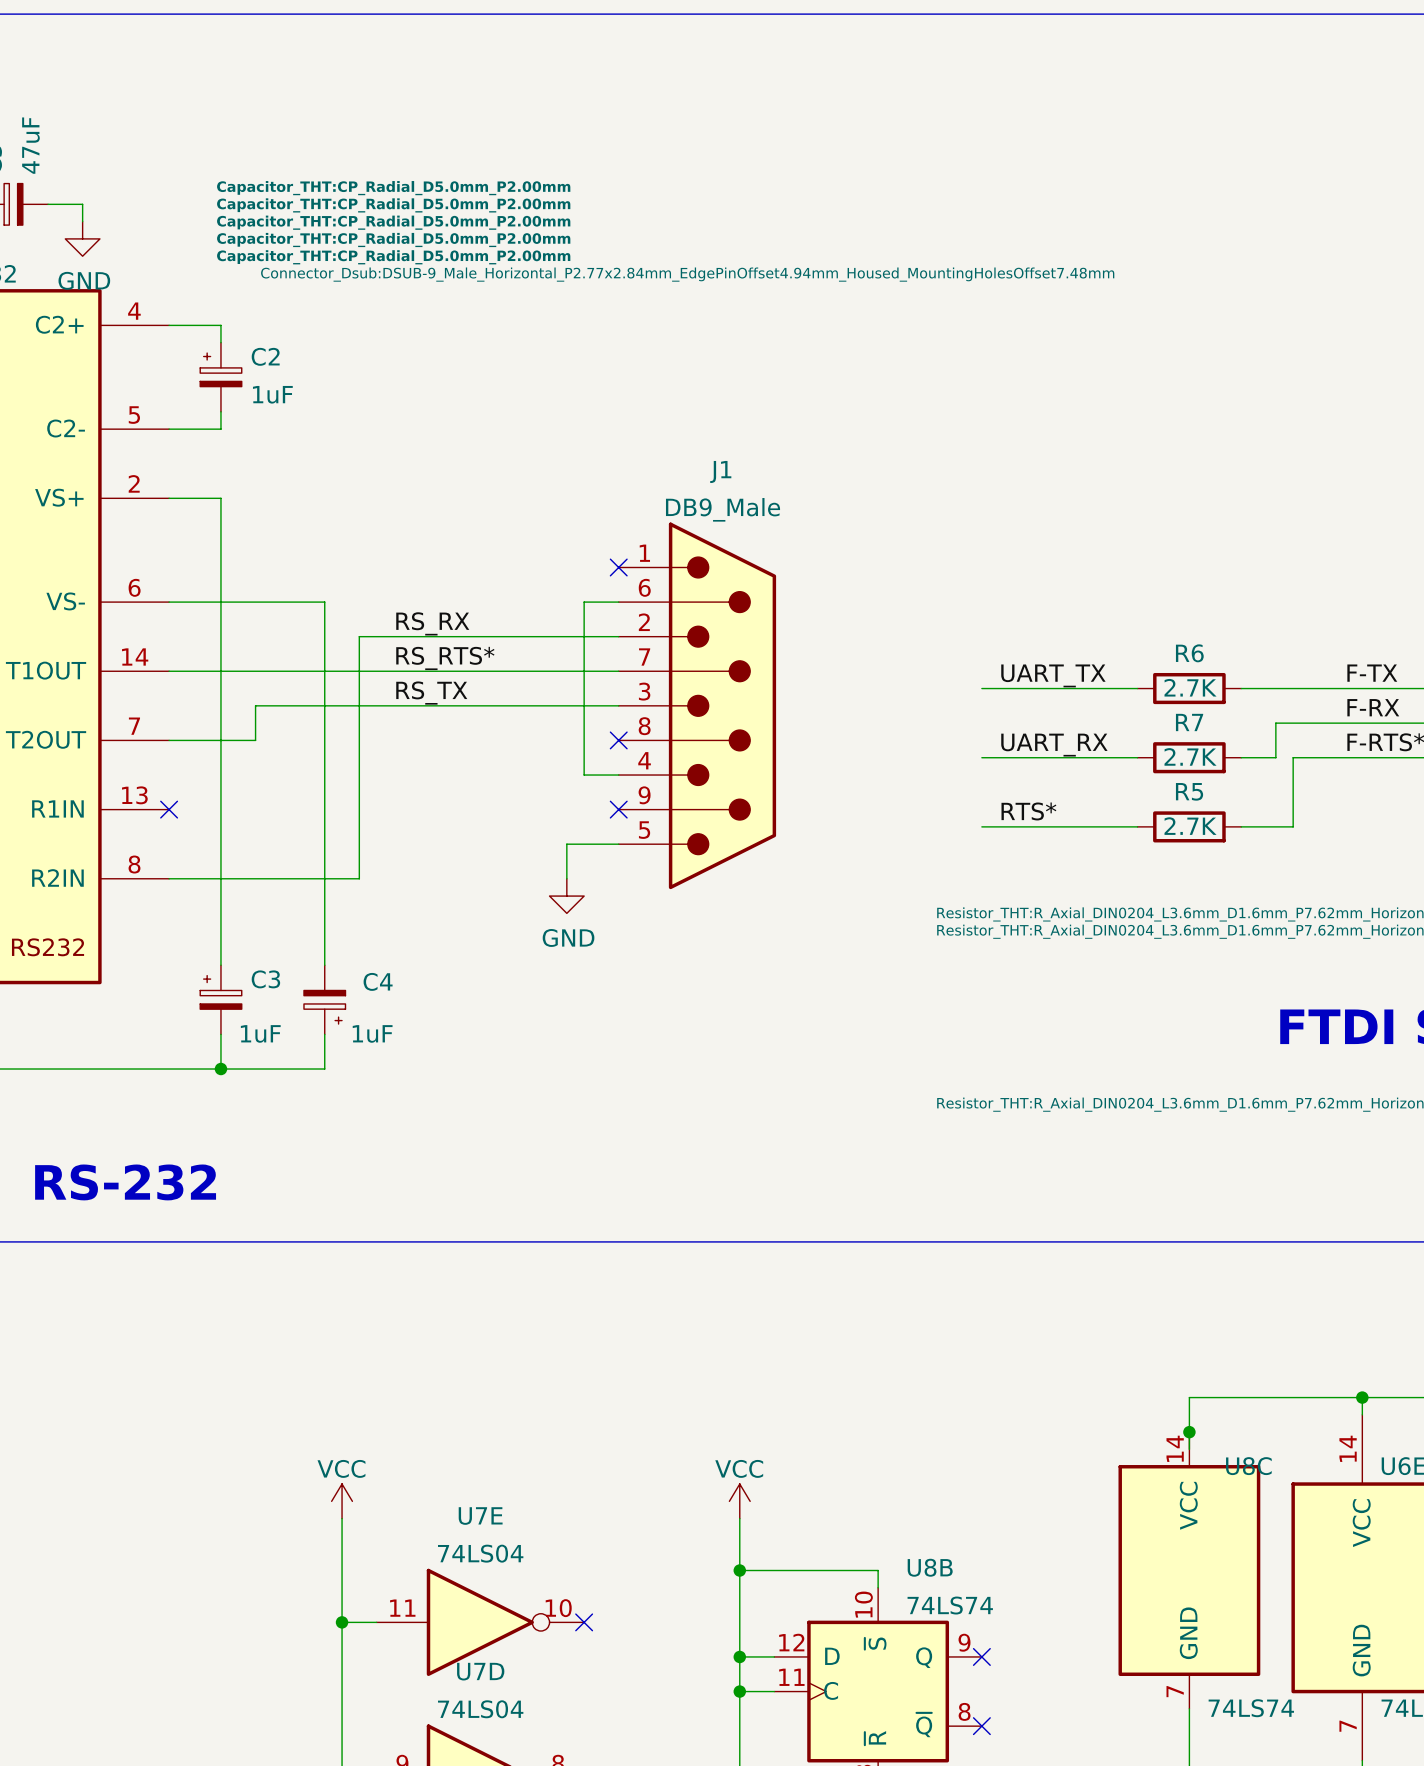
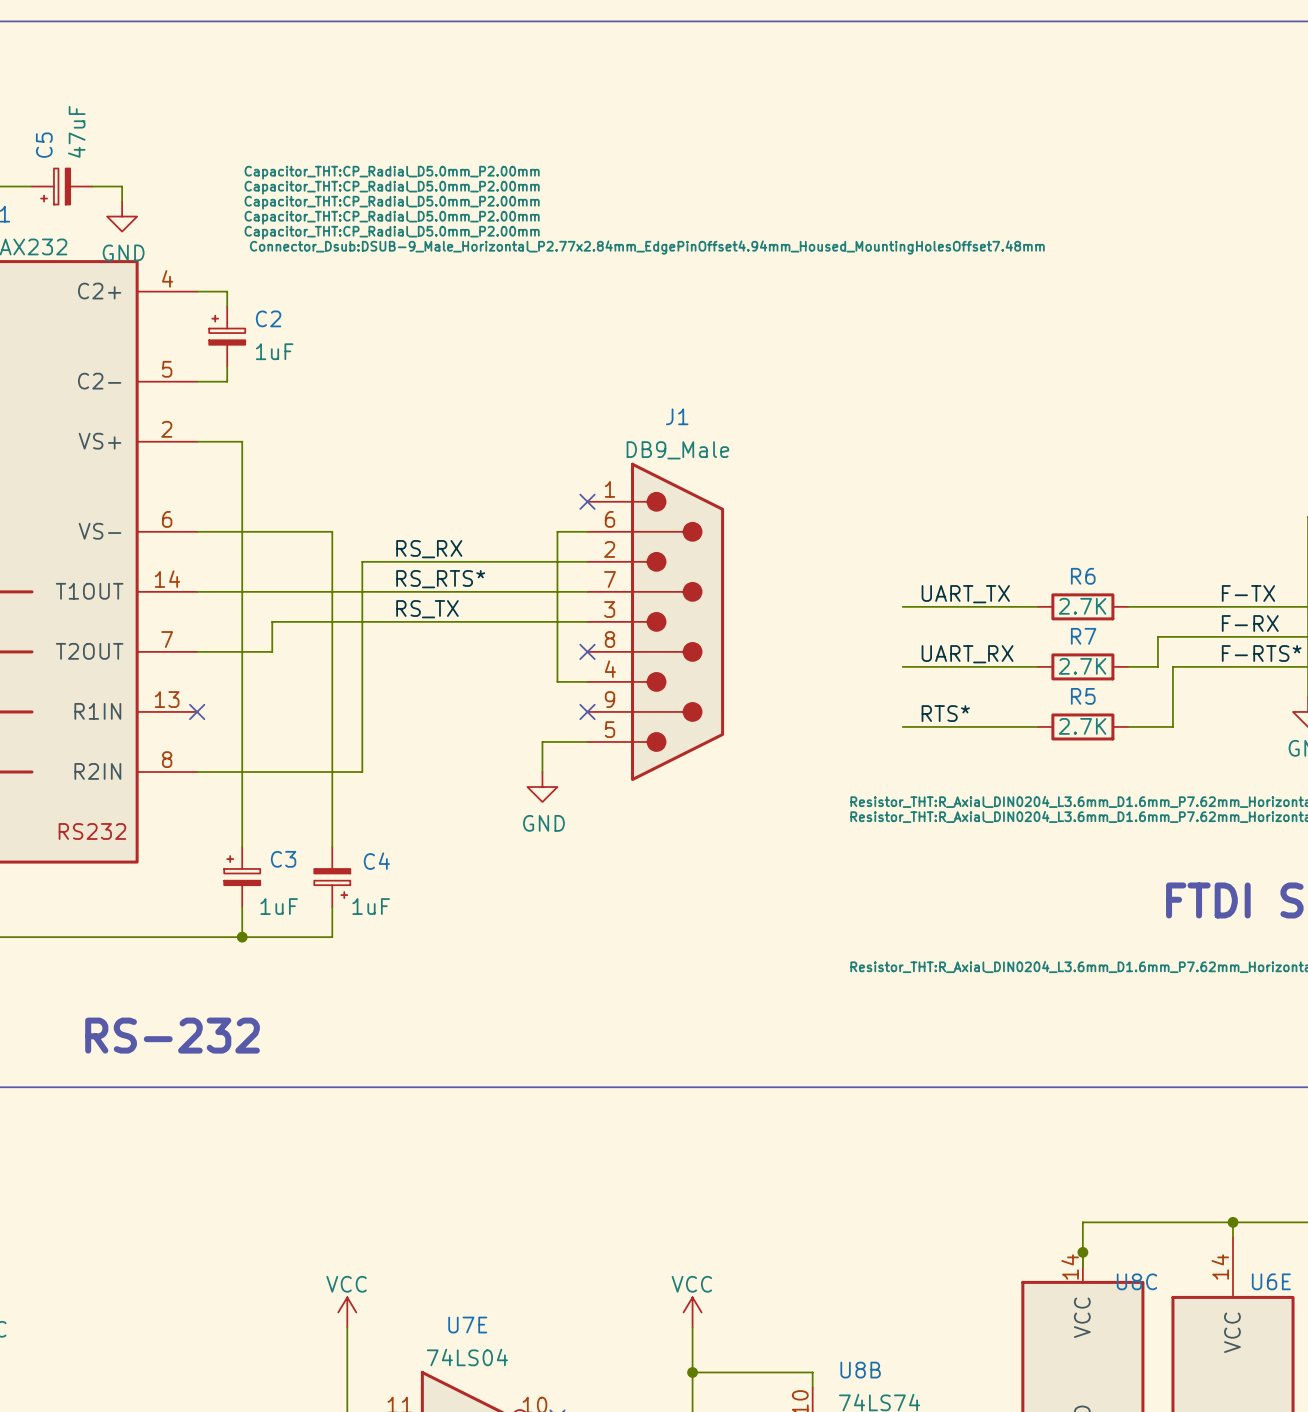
wire: (203, 325) (220, 325) (220, 342) -> (227, 291) (227, 306)
C2 position: (220, 377) -> (227, 336)
wire: (220, 411) (220, 429) (203, 429) -> (227, 366) (227, 381)

